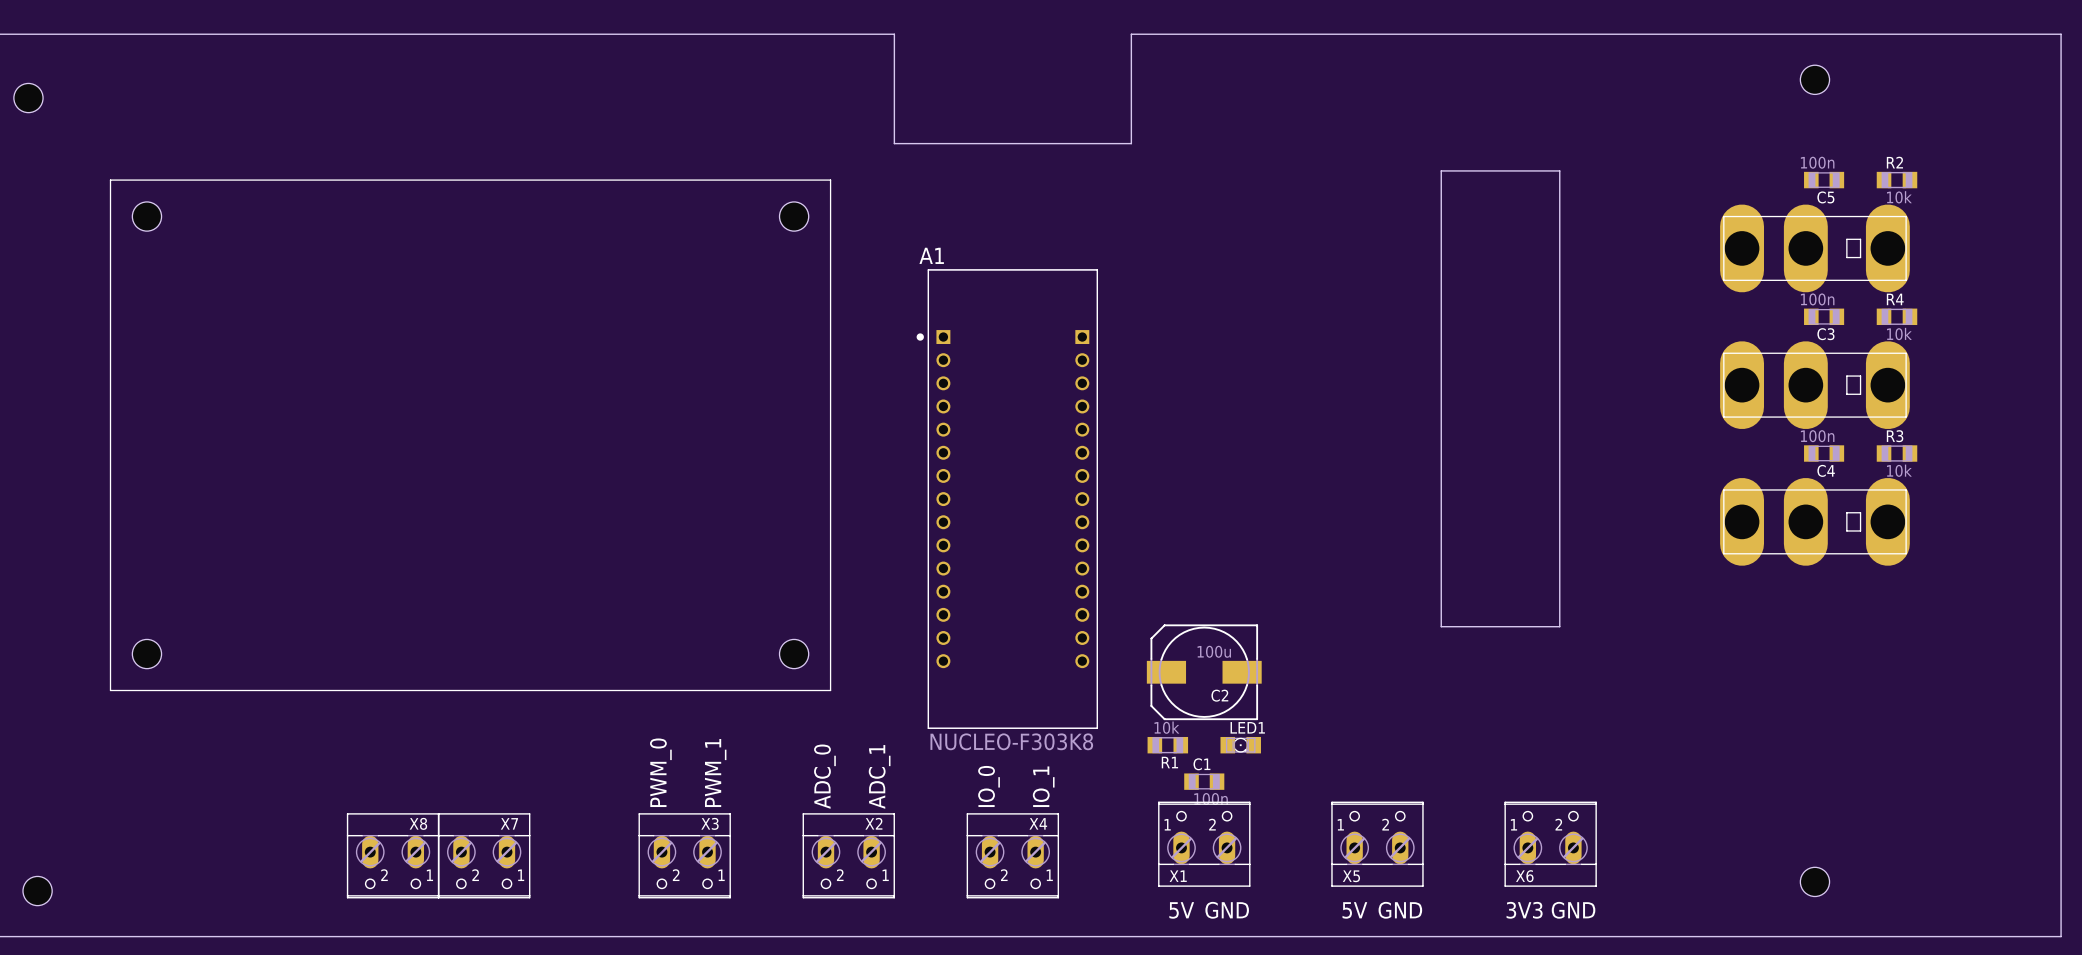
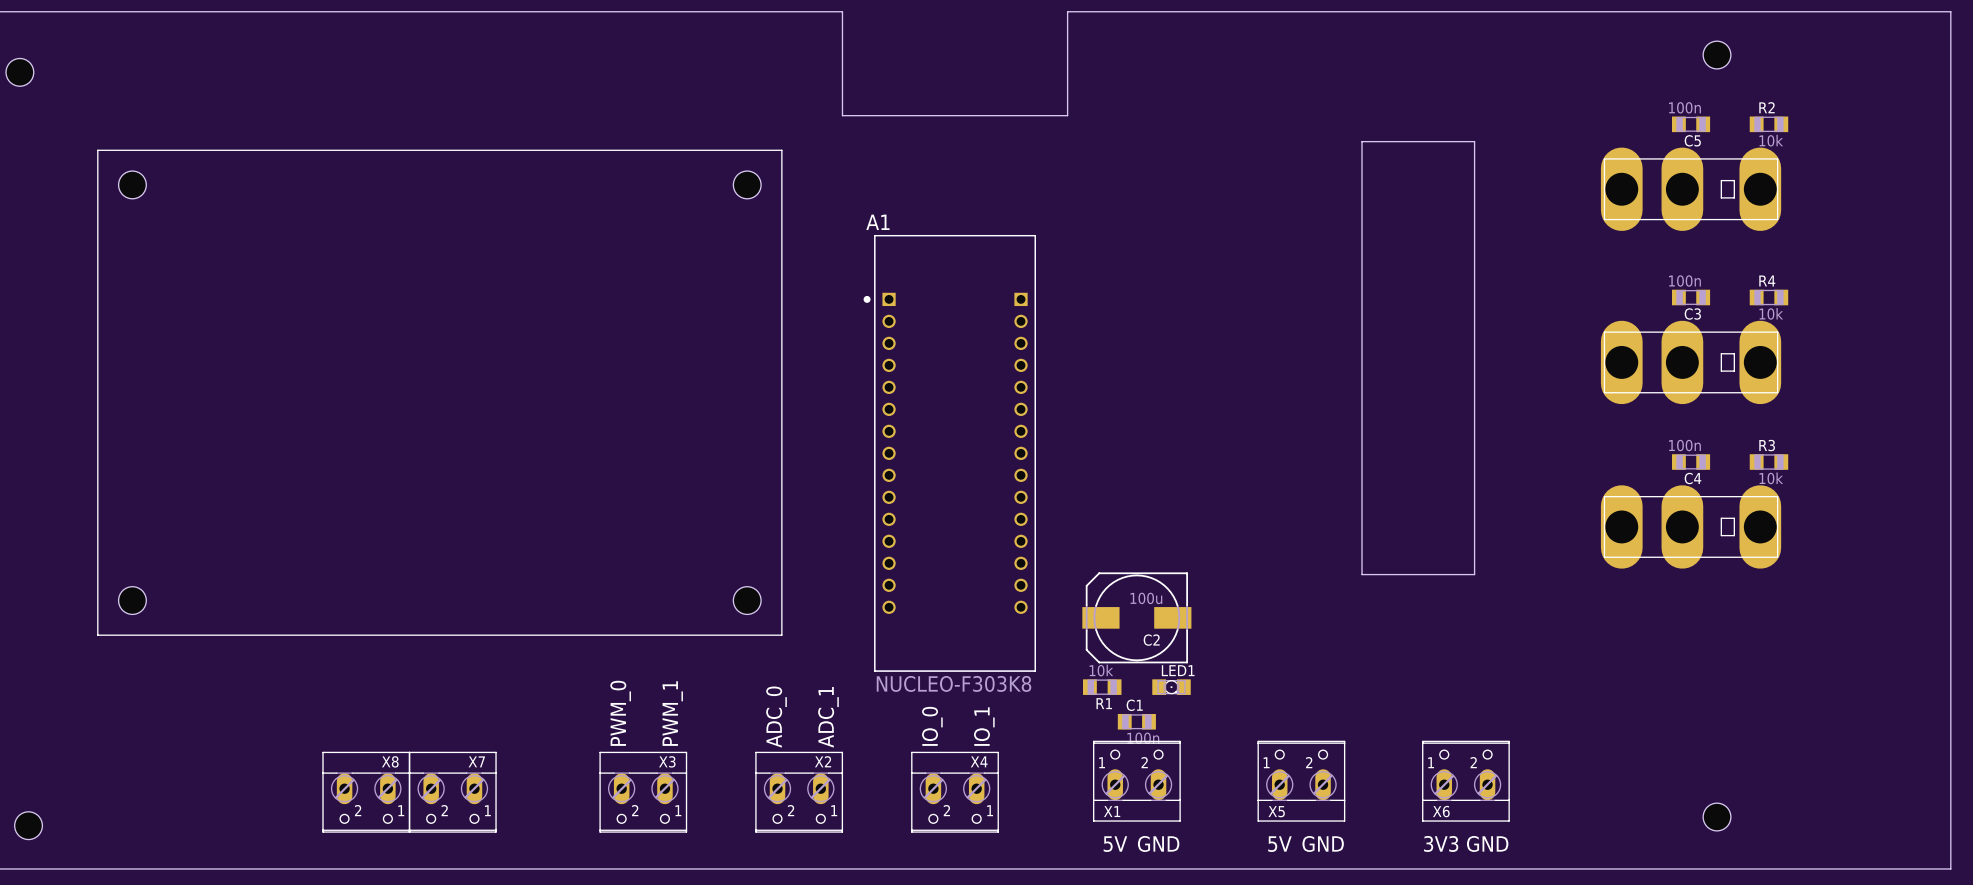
C5 position: (1824, 180) -> (1691, 124)
R2 position: (1897, 180) -> (1768, 124)
part position: (1814, 248) -> (1691, 189)
C3 position: (1824, 316) -> (1691, 297)
R4 position: (1897, 316) -> (1768, 297)
part position: (1814, 385) -> (1691, 362)
C4 position: (1824, 453) -> (1691, 462)
R3 position: (1897, 453) -> (1768, 462)
part: (1814, 521) -> none
part: none -> (1691, 526)

